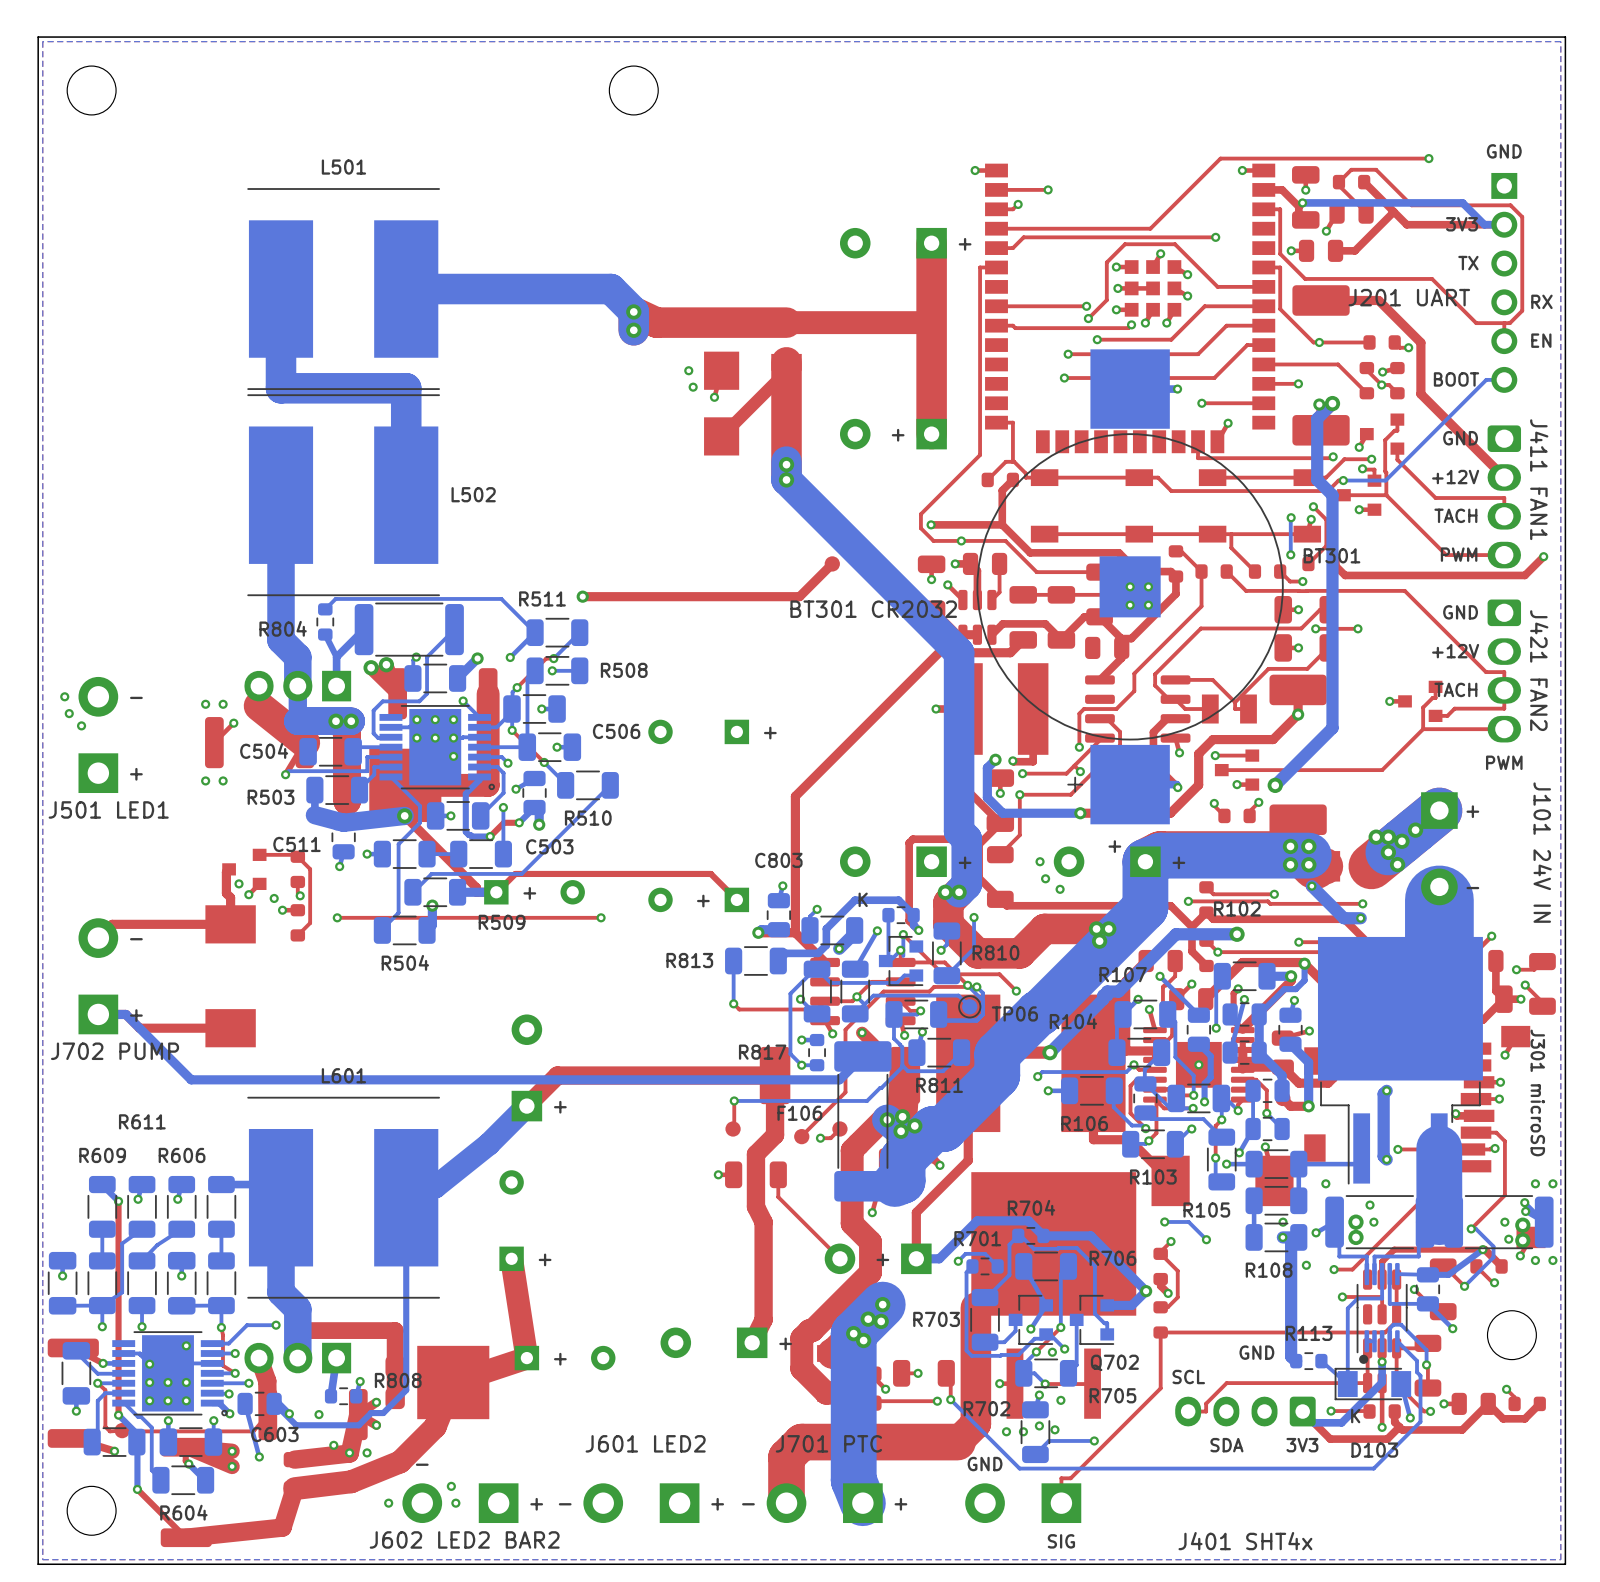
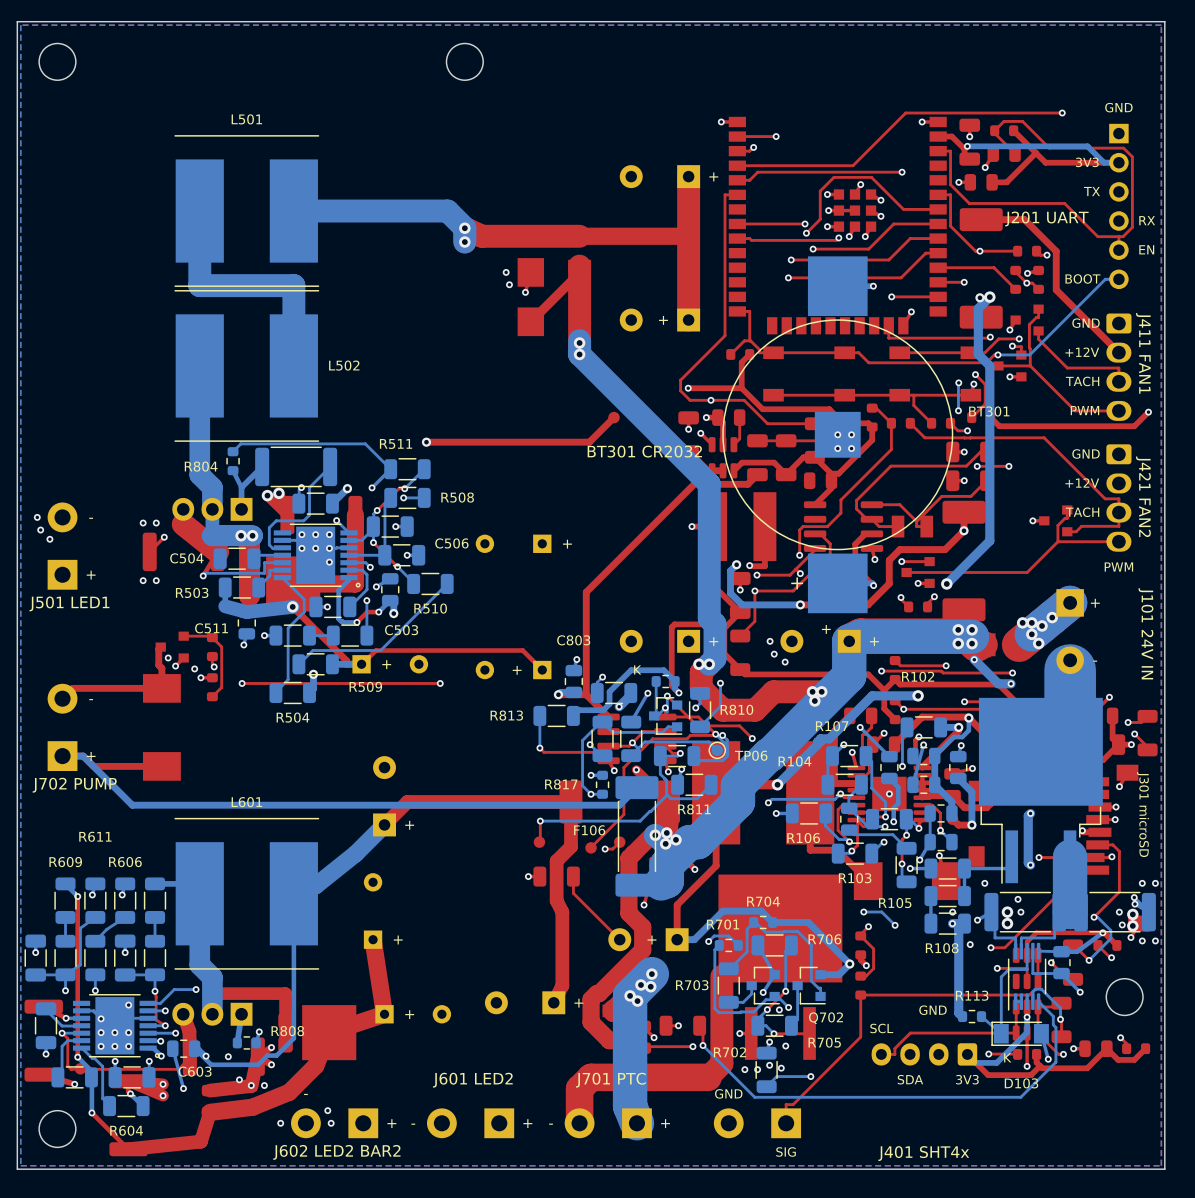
drawing: [1359, 1354, 1369, 1364] -> none

